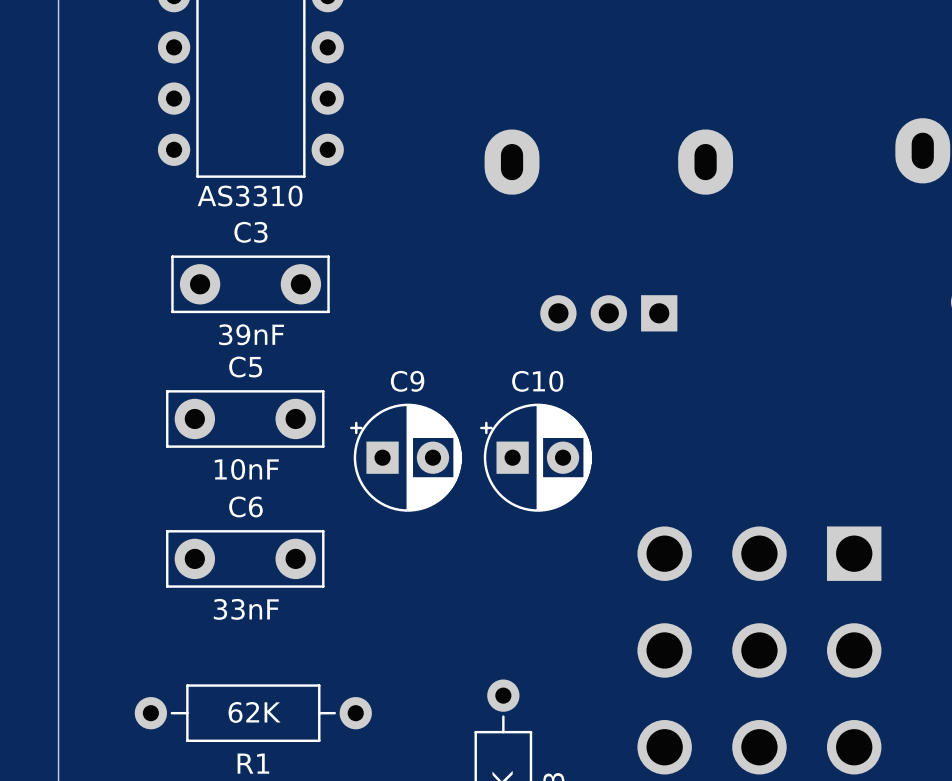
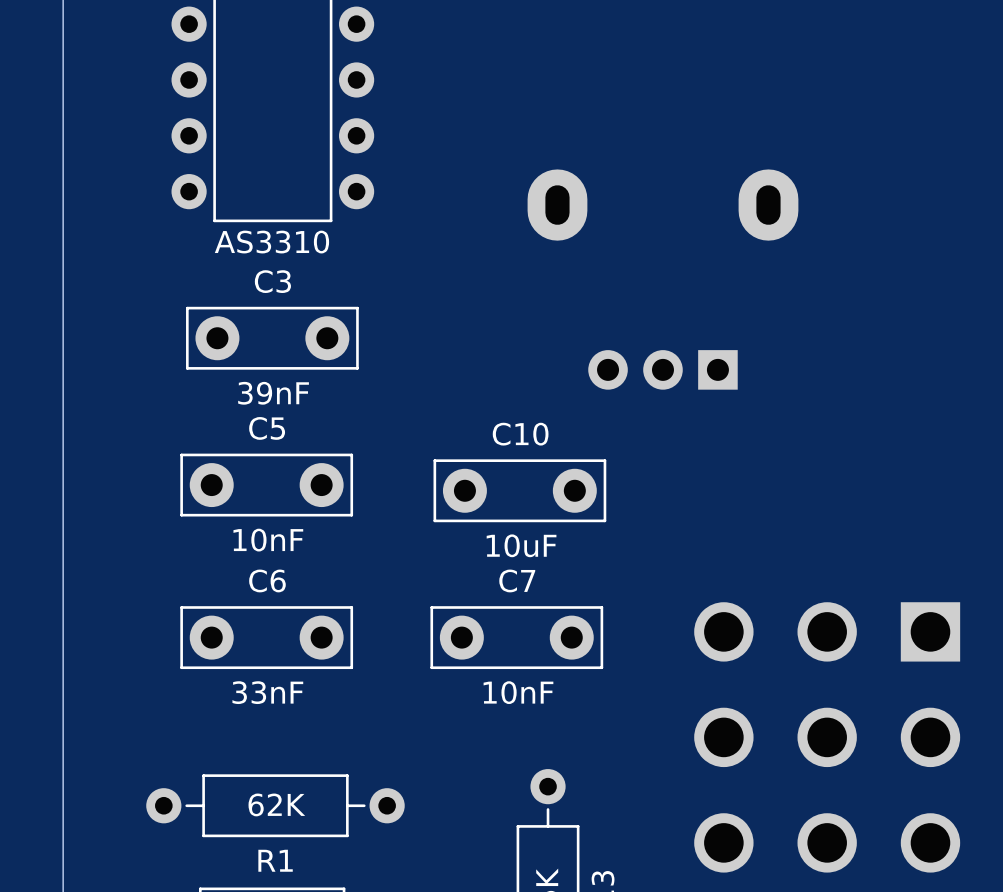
C10 footprint: [480, 403, 592, 512] -> [433, 459, 607, 523]
C9: (405, 457) -> none
C10 value: none -> 10uF (521, 545)
C7: none -> 10nF (516, 637)

